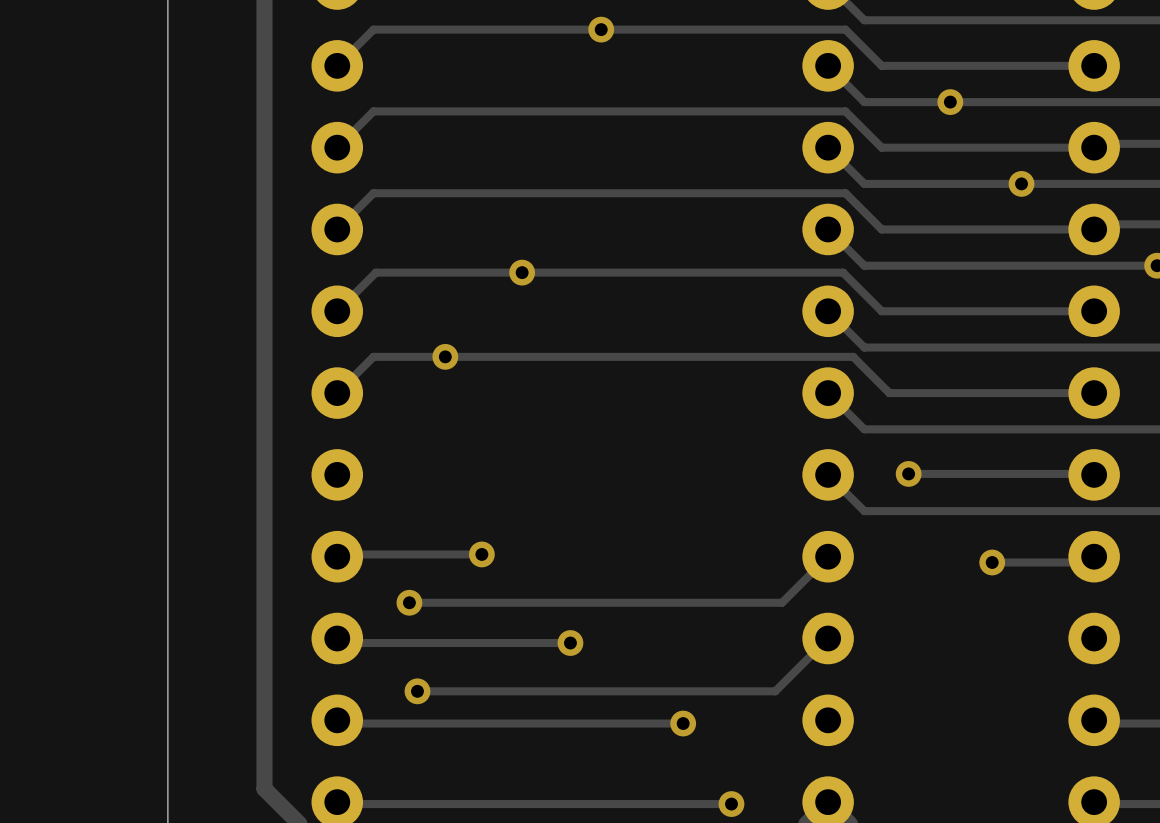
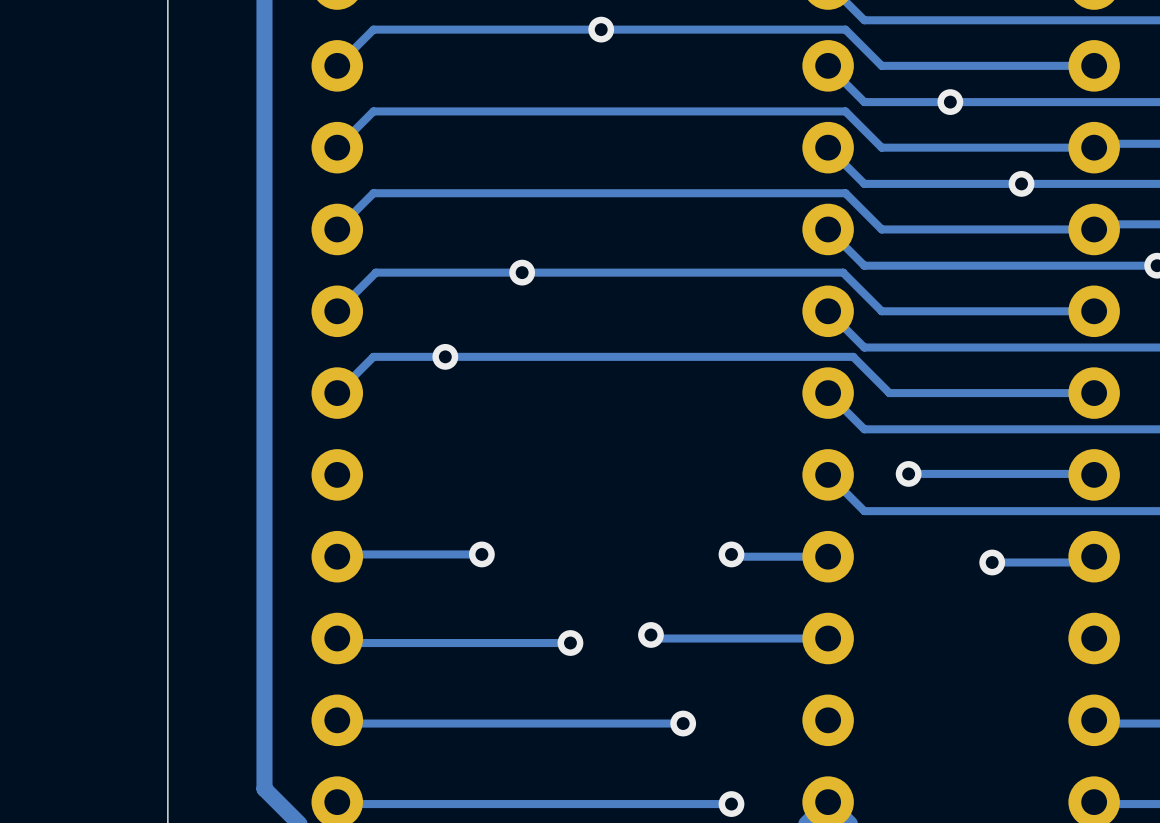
via: none -> (731, 554)
track: (828, 556) (782, 602) (409, 602) -> (828, 556) (733, 556) (731, 554)
via: (409, 602) -> none
via: none -> (650, 634)
track: (828, 638) (775, 691) (417, 691) -> (828, 638) (654, 638) (650, 634)
via: (417, 691) -> none

